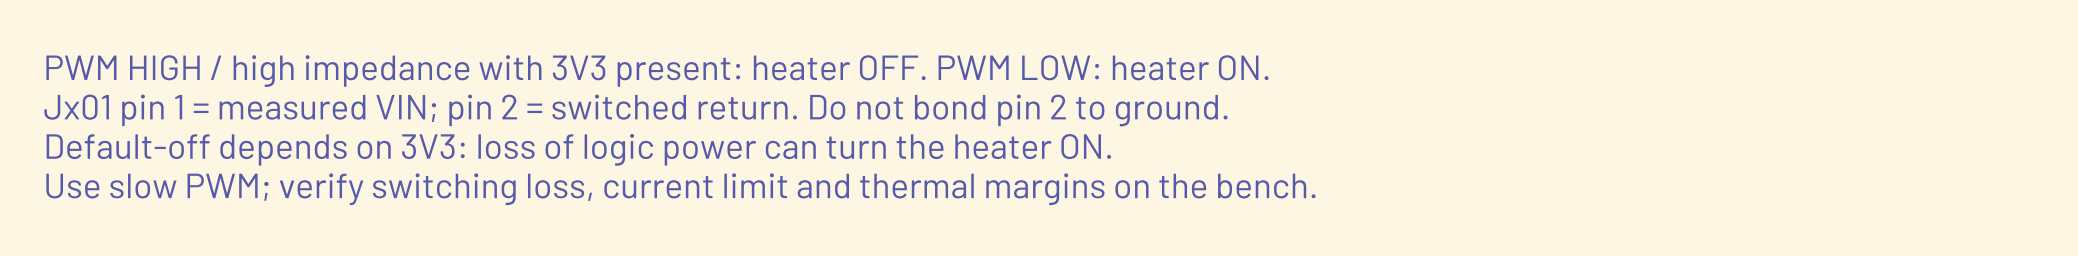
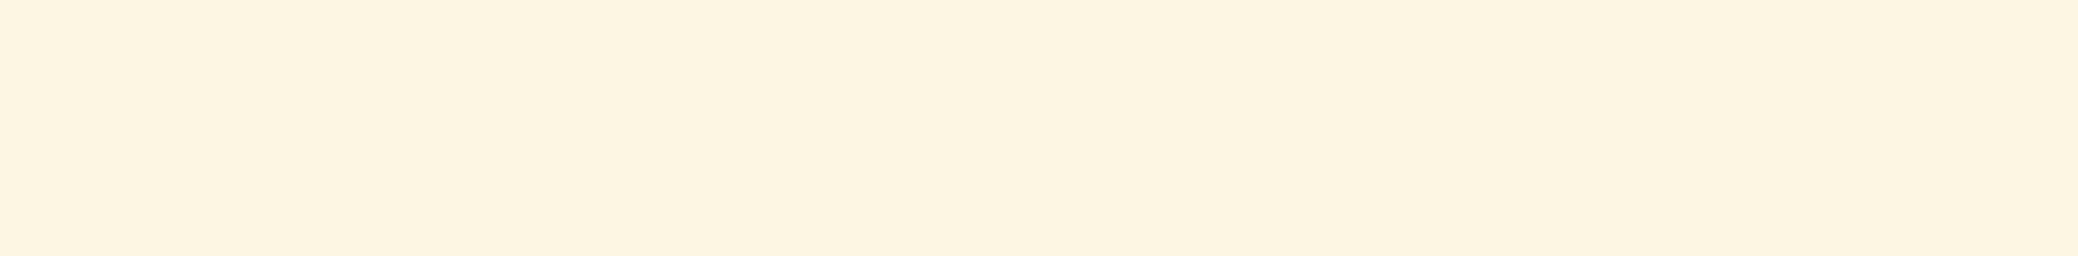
text: PWM HIGH / high impedance with 3V3 present: heater OFF. PWM LOW: heater ON. (657, 71) -> none
text: Jx01 pin 1 = measured VIN; pin 2 = switched return. Do not bond pin 2 to ground. (635, 110) -> none
text: Default-off depends on 3V3: loss of logic power can turn the heater ON. (578, 149) -> none
text: Use slow PWM; verify switching loss, current limit and thermal margins on the bench. (680, 189) -> none

